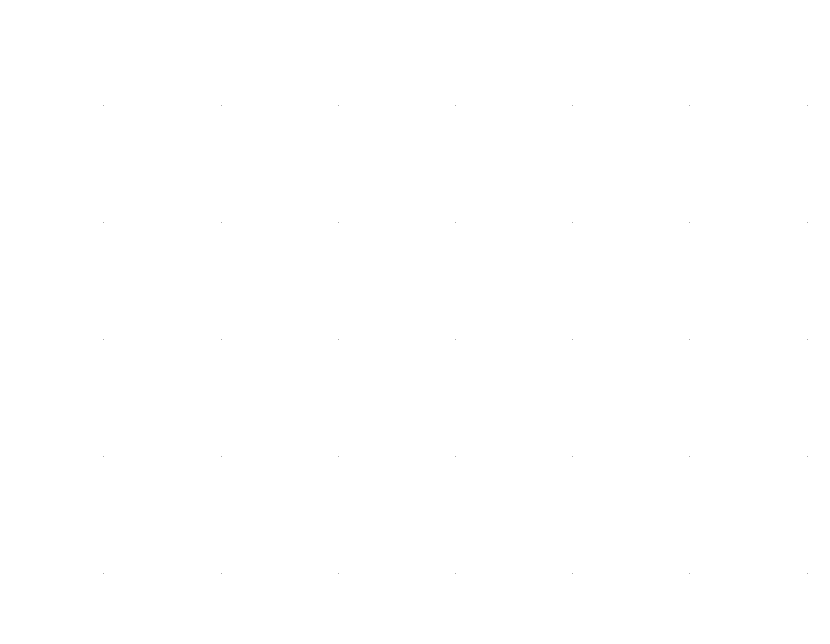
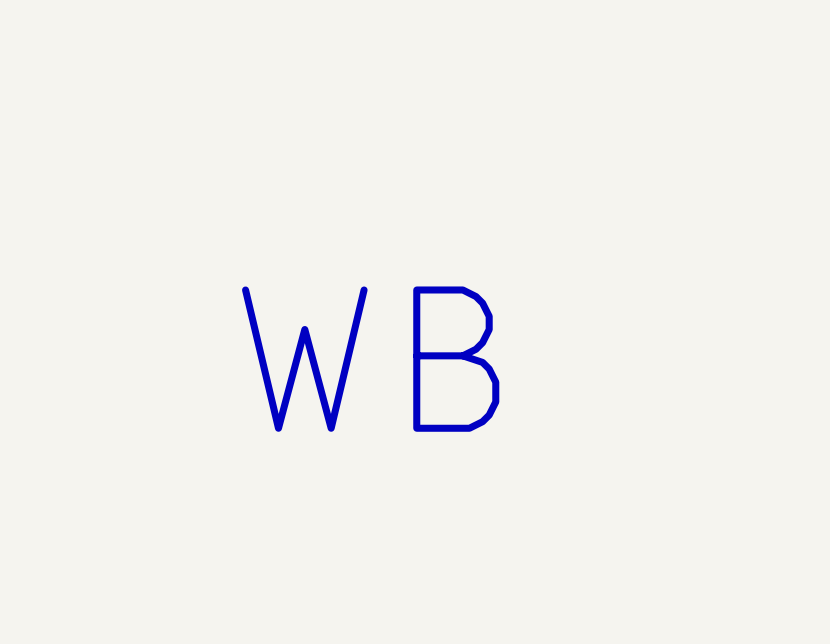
text: none -> WB (370, 359)

